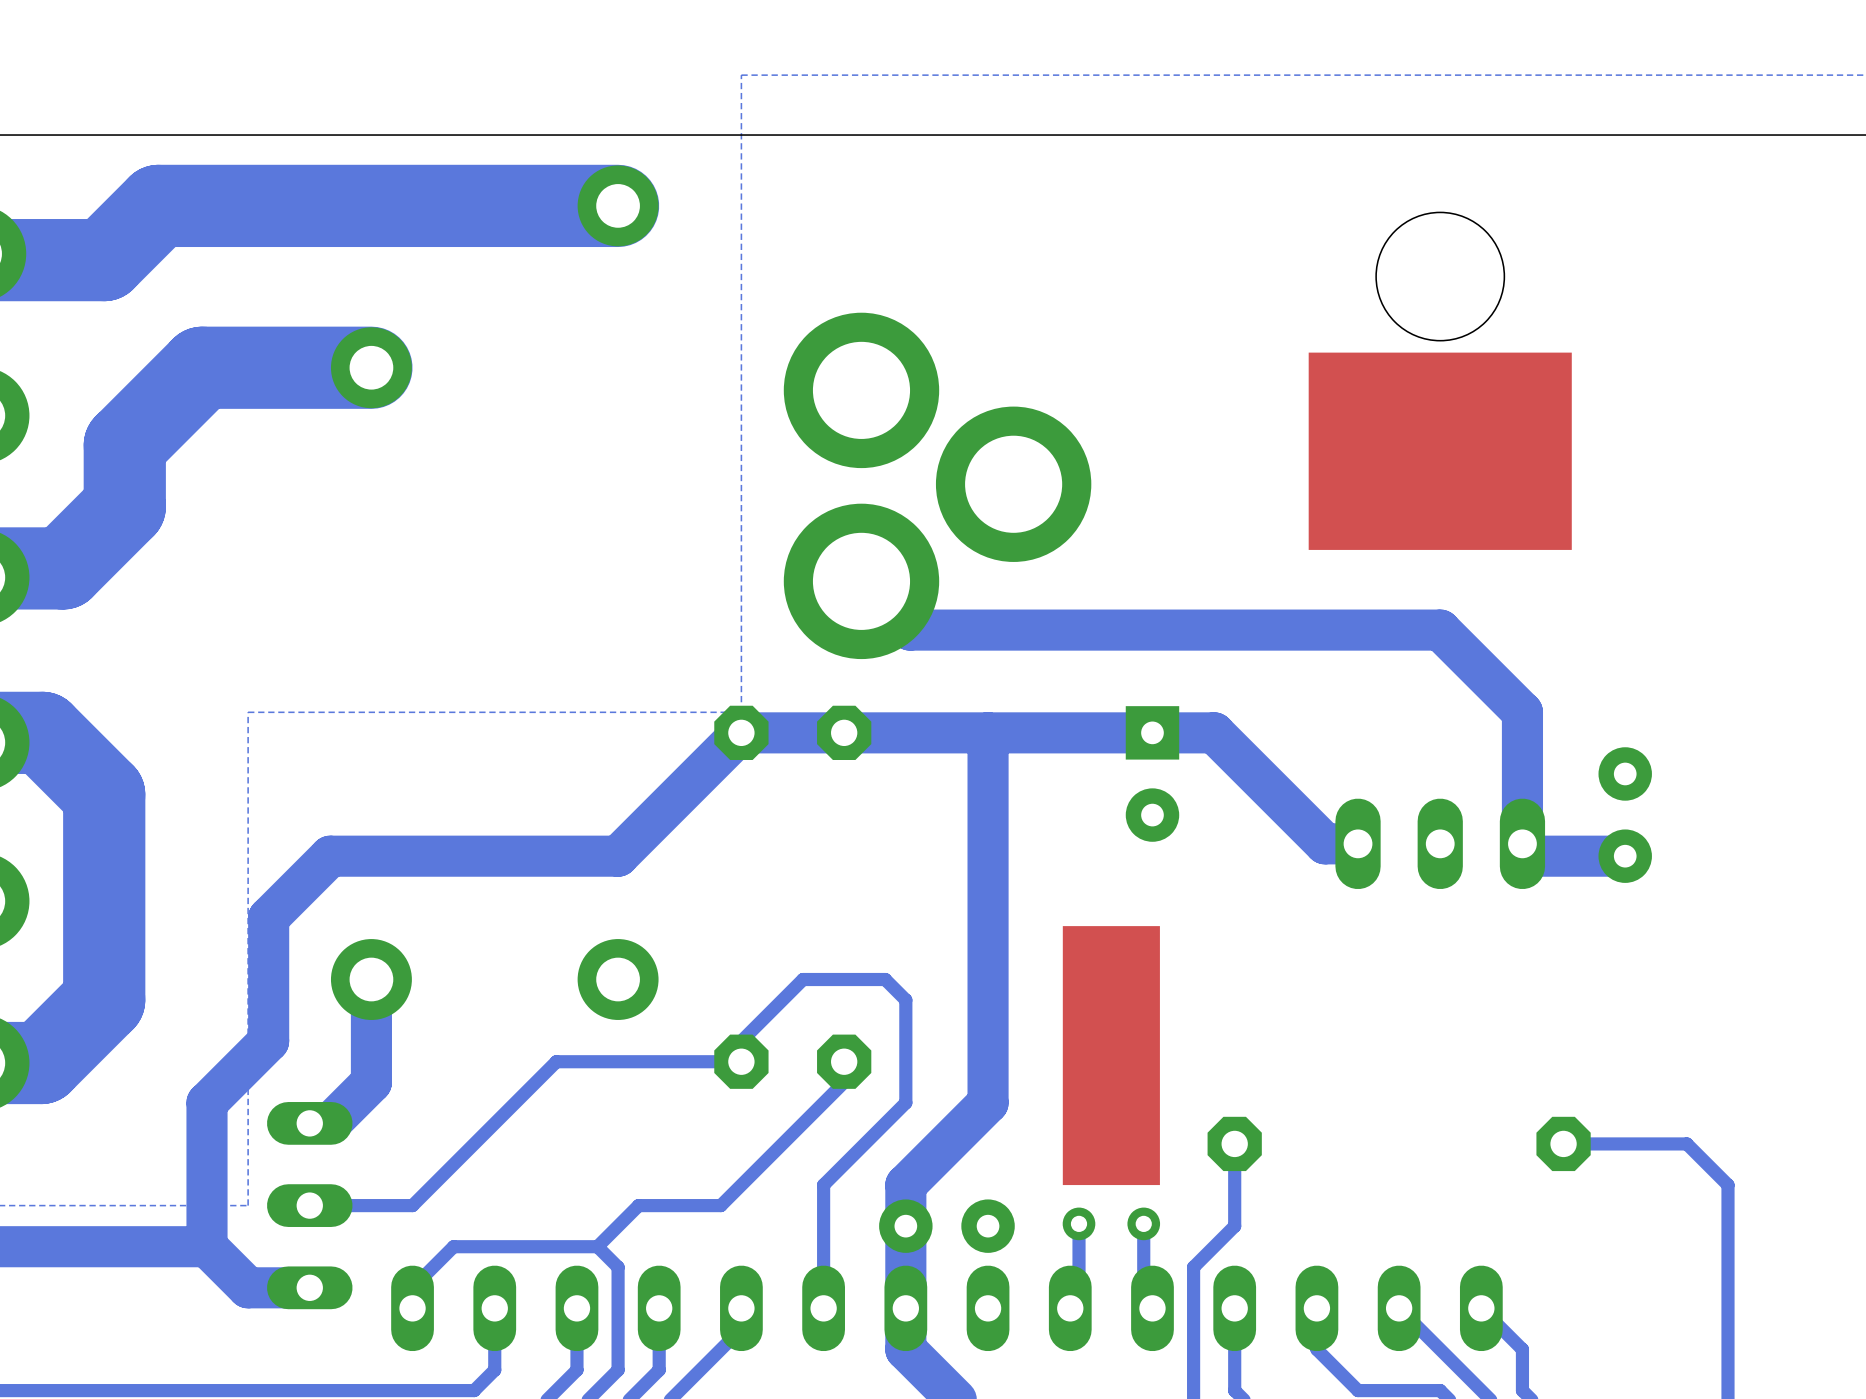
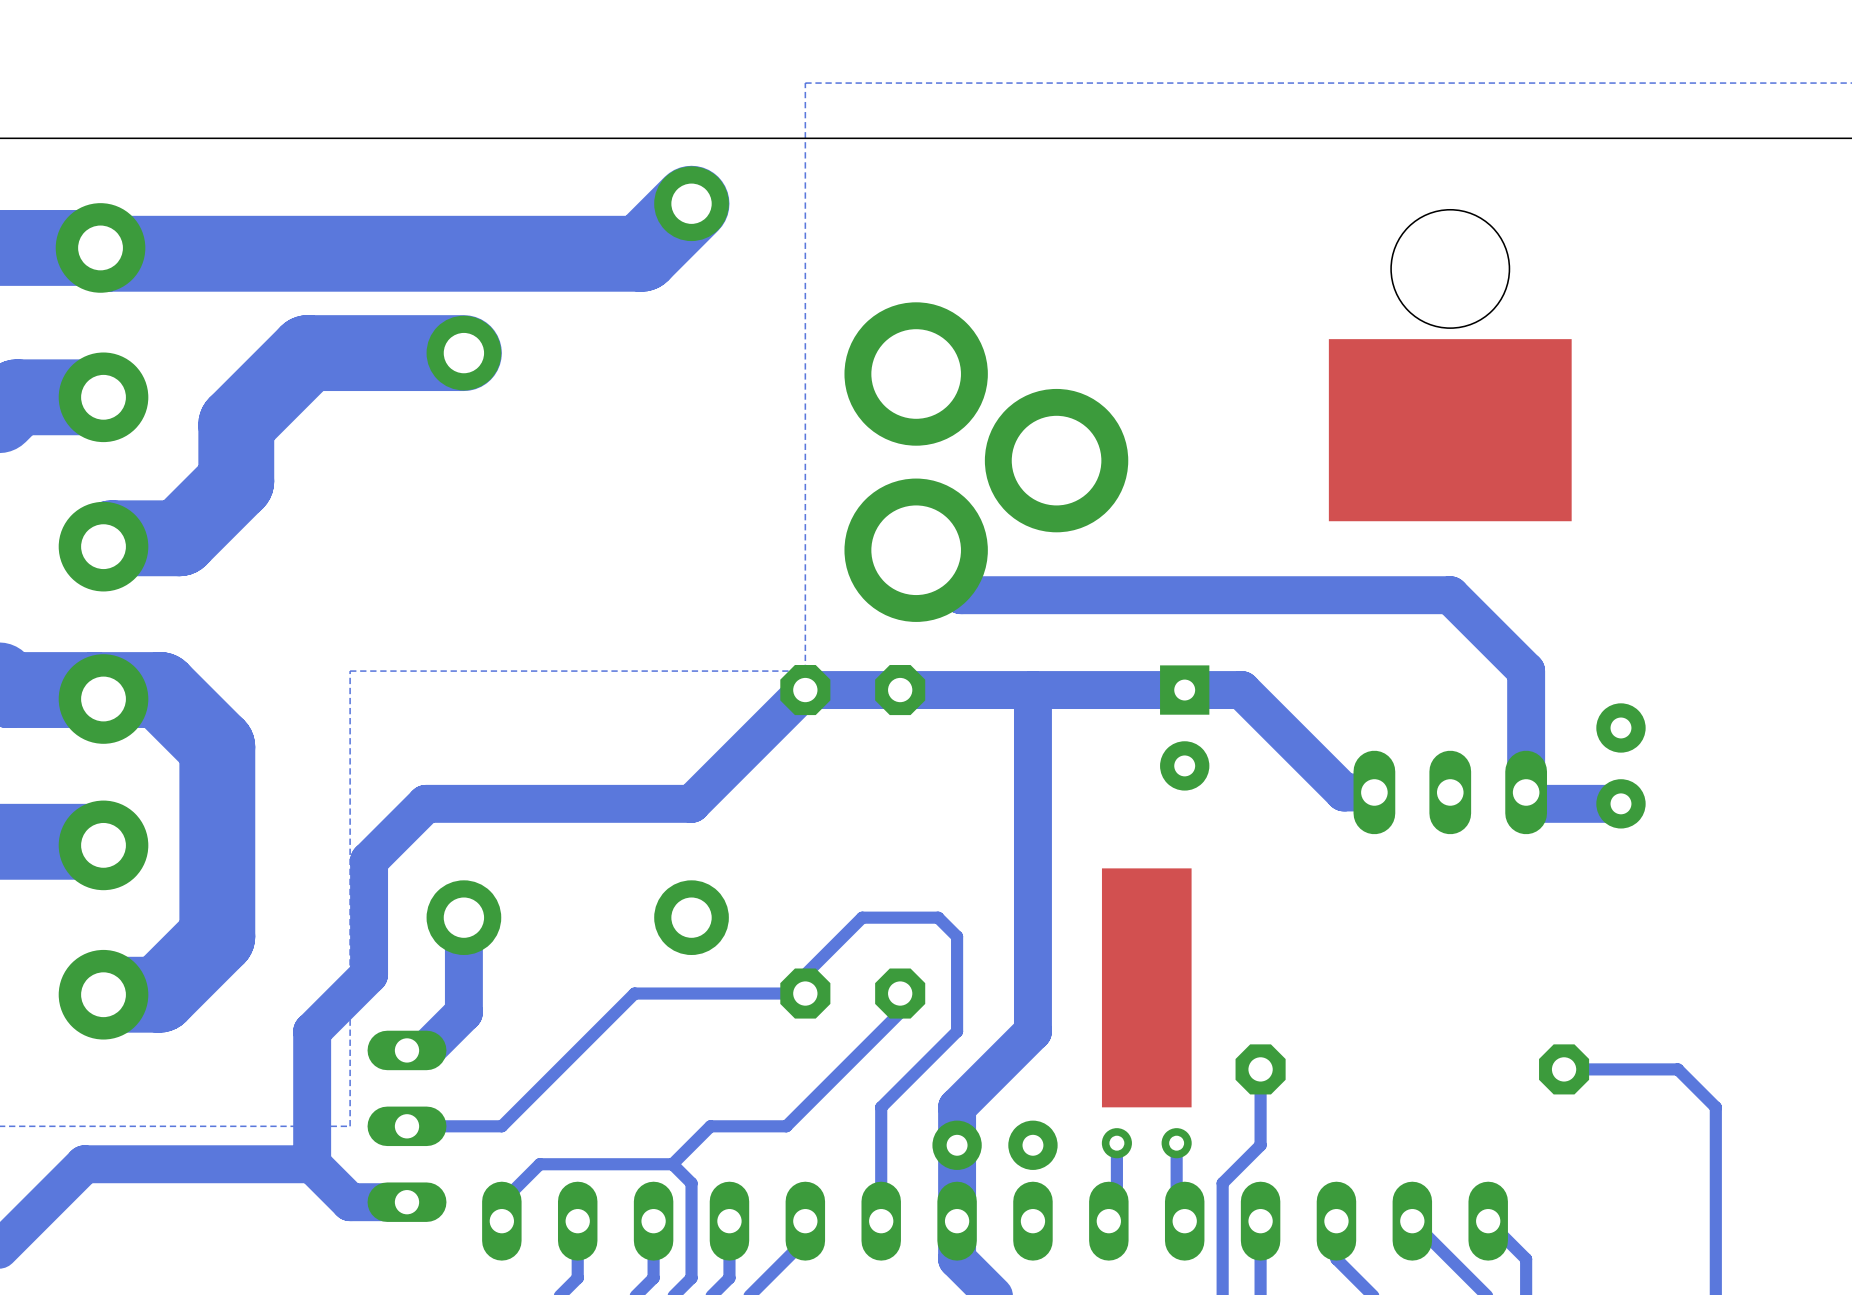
bottom track: (618, 205) (158, 205) (104, 260) -> (691, 203) (641, 253) (217, 253)

